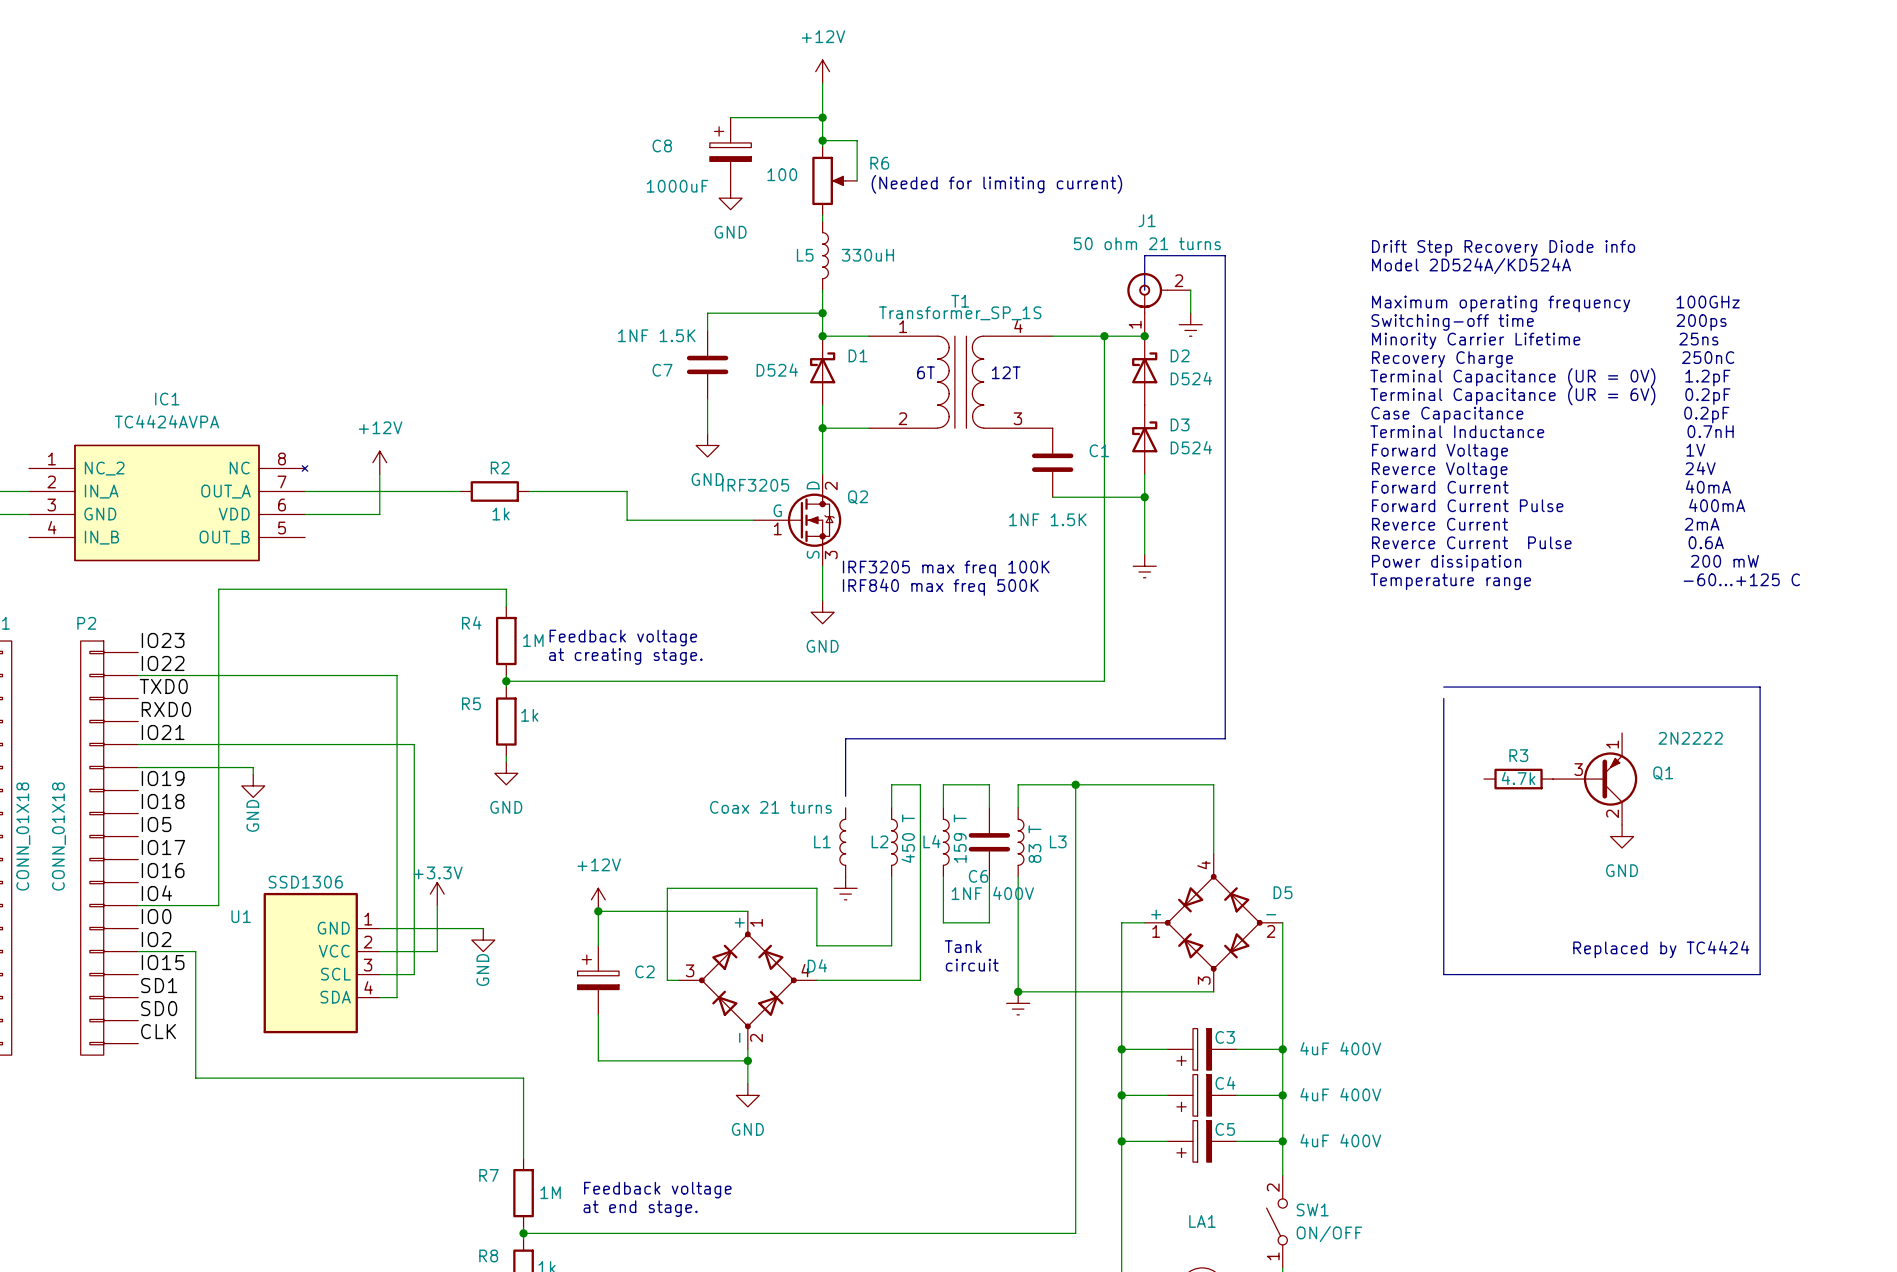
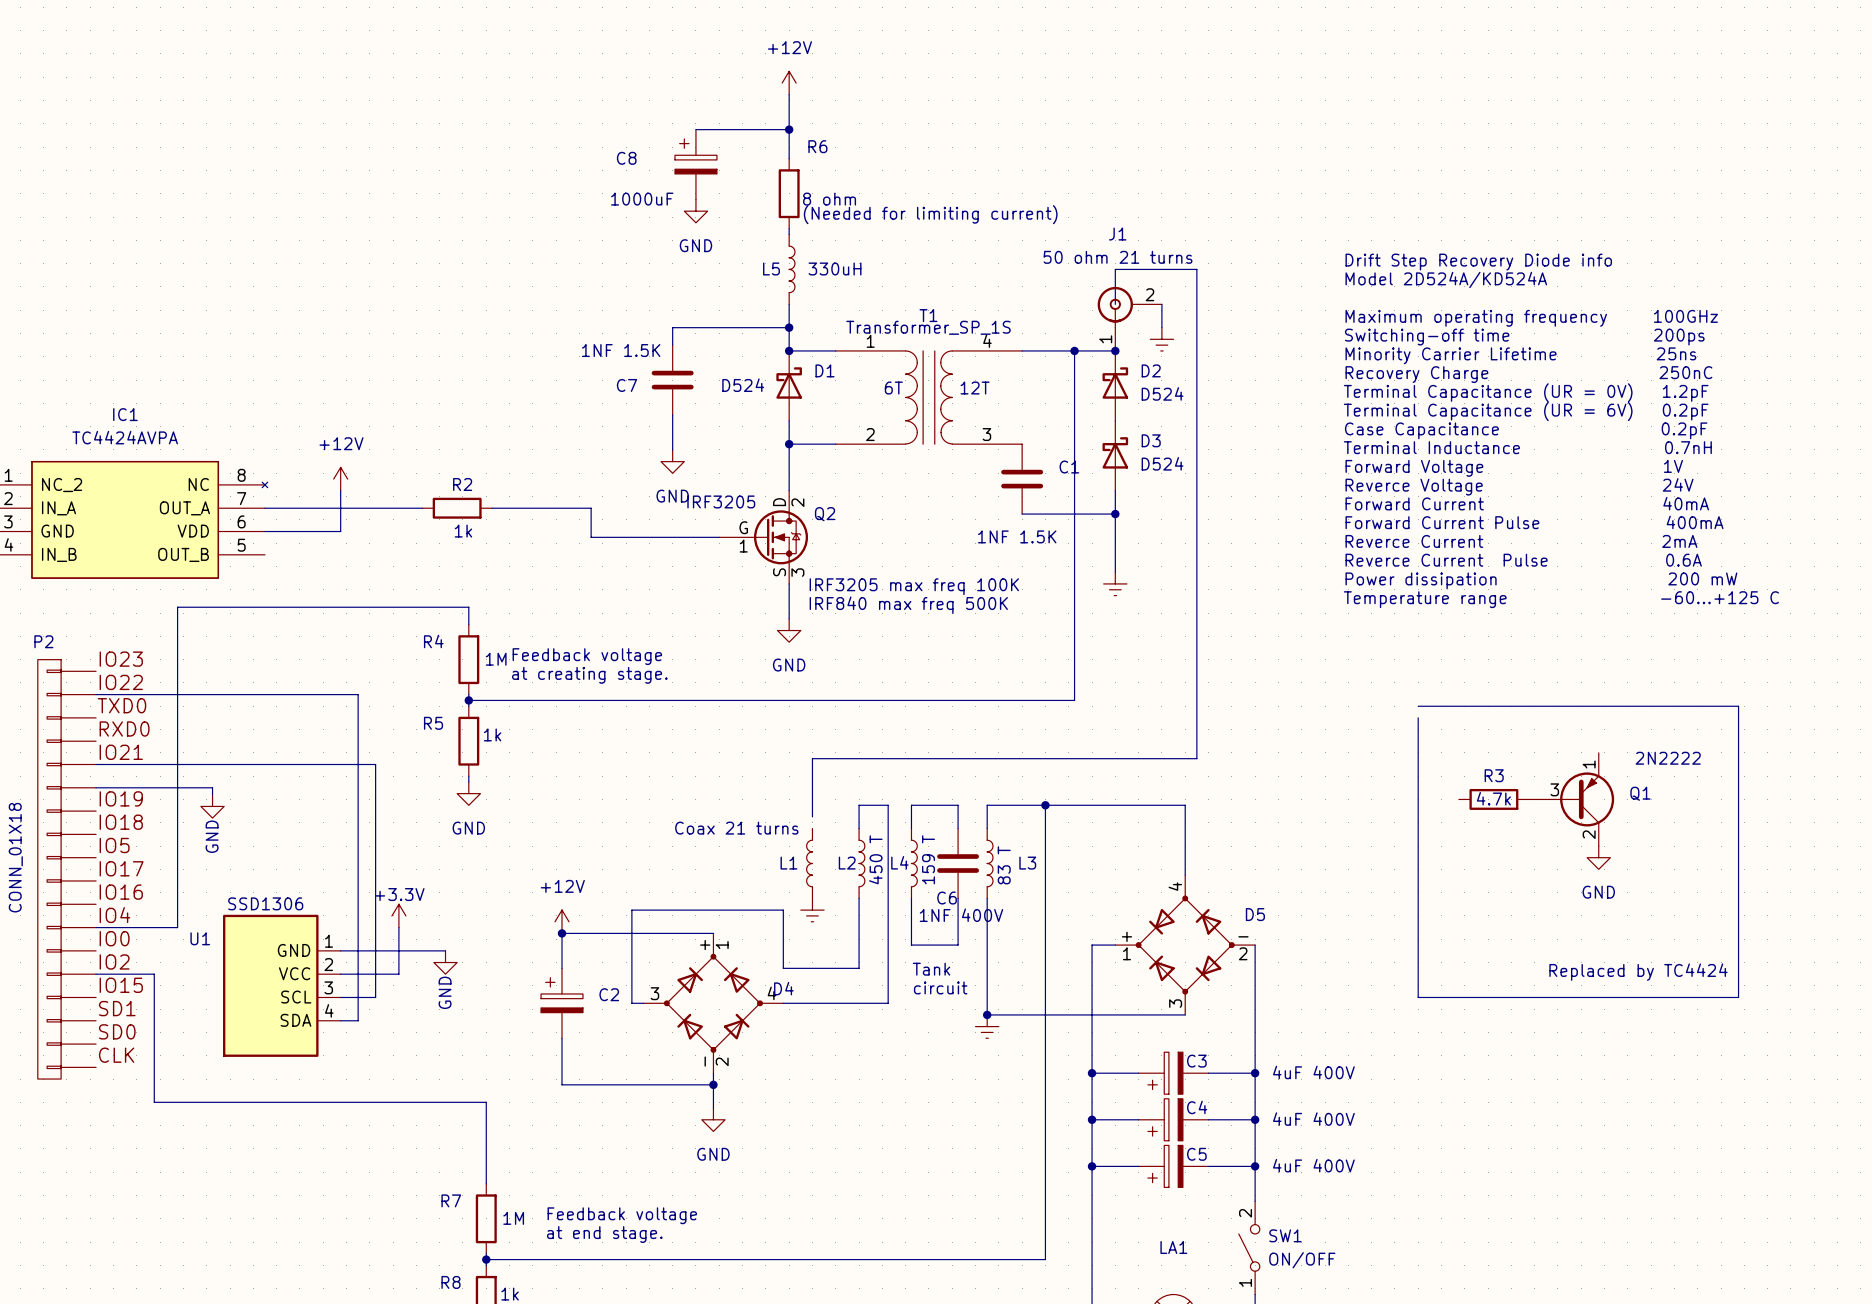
wire: (822, 140) (857, 140) (857, 180) -> none
junction: (822, 140) -> none
R6 symbol: [812, 146, 858, 216] -> [778, 158, 800, 229]
R6 name position: R6 (879, 163) -> R6 (817, 146)
R6 value: 100 (782, 174) -> 8 ohm (829, 199)
text position: (Needed for limiting current) (996, 184) -> (Needed for limiting current) (930, 214)

